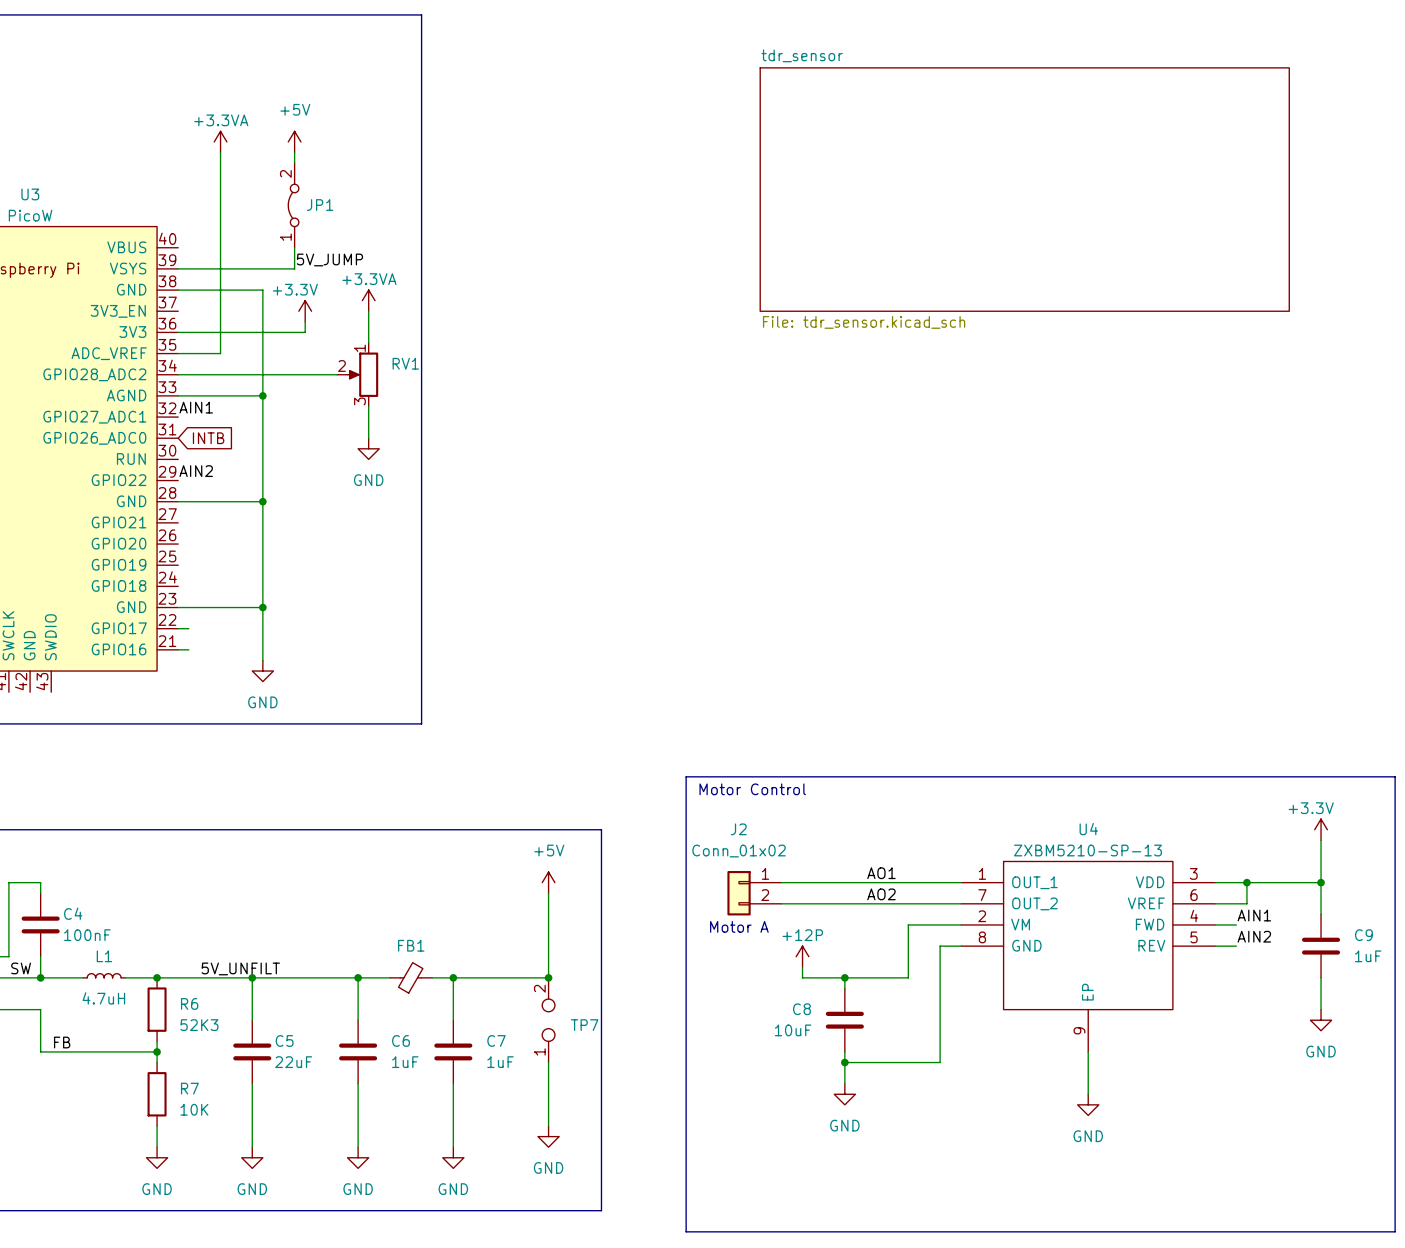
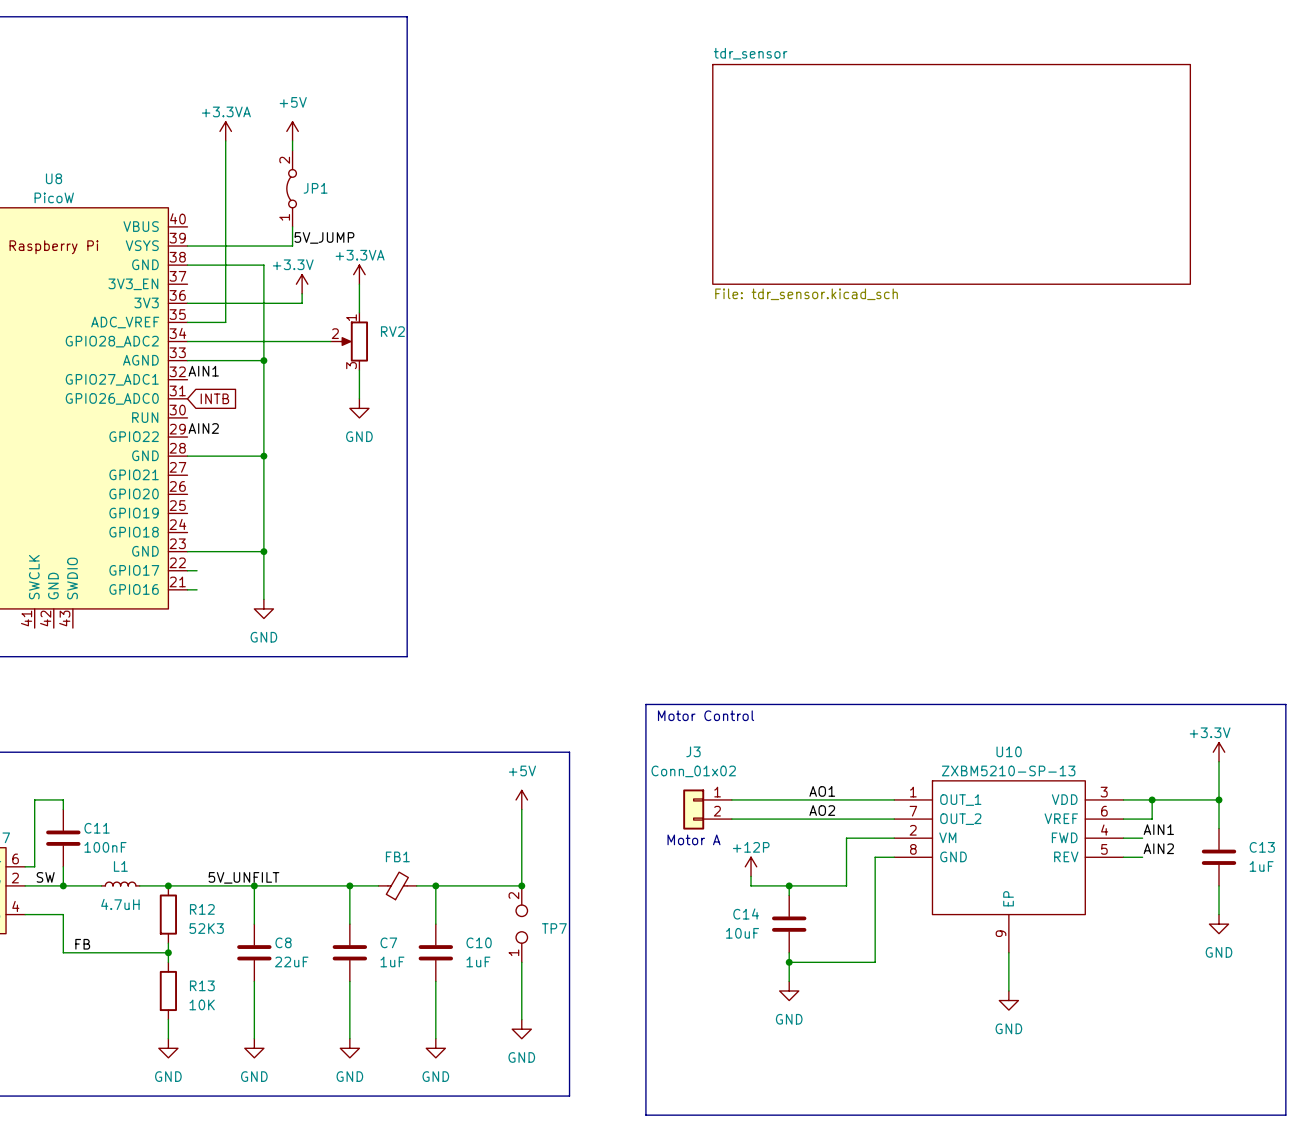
U3 name: U3 (30, 194) -> U8 (54, 178)
RV1 name: RV1 (405, 363) -> RV2 (392, 331)
J2 name: J2 (738, 829) -> J3 (693, 751)
U4 name: U4 (1088, 829) -> U10 (1009, 751)
C4 name: C4 (73, 913) -> C11 (97, 828)
C9 name: C9 (1363, 935) -> C13 (1262, 847)
R6 name: R6 (189, 1003) -> R12 (202, 909)
C8 name: C8 (801, 1009) -> C14 (746, 913)
C5 name: C5 (284, 1040) -> C8 (283, 942)
C6 name: C6 (401, 1040) -> C7 (388, 942)
C7 name: C7 (496, 1040) -> C10 (479, 942)
R7 name: R7 (189, 1088) -> R13 (202, 985)

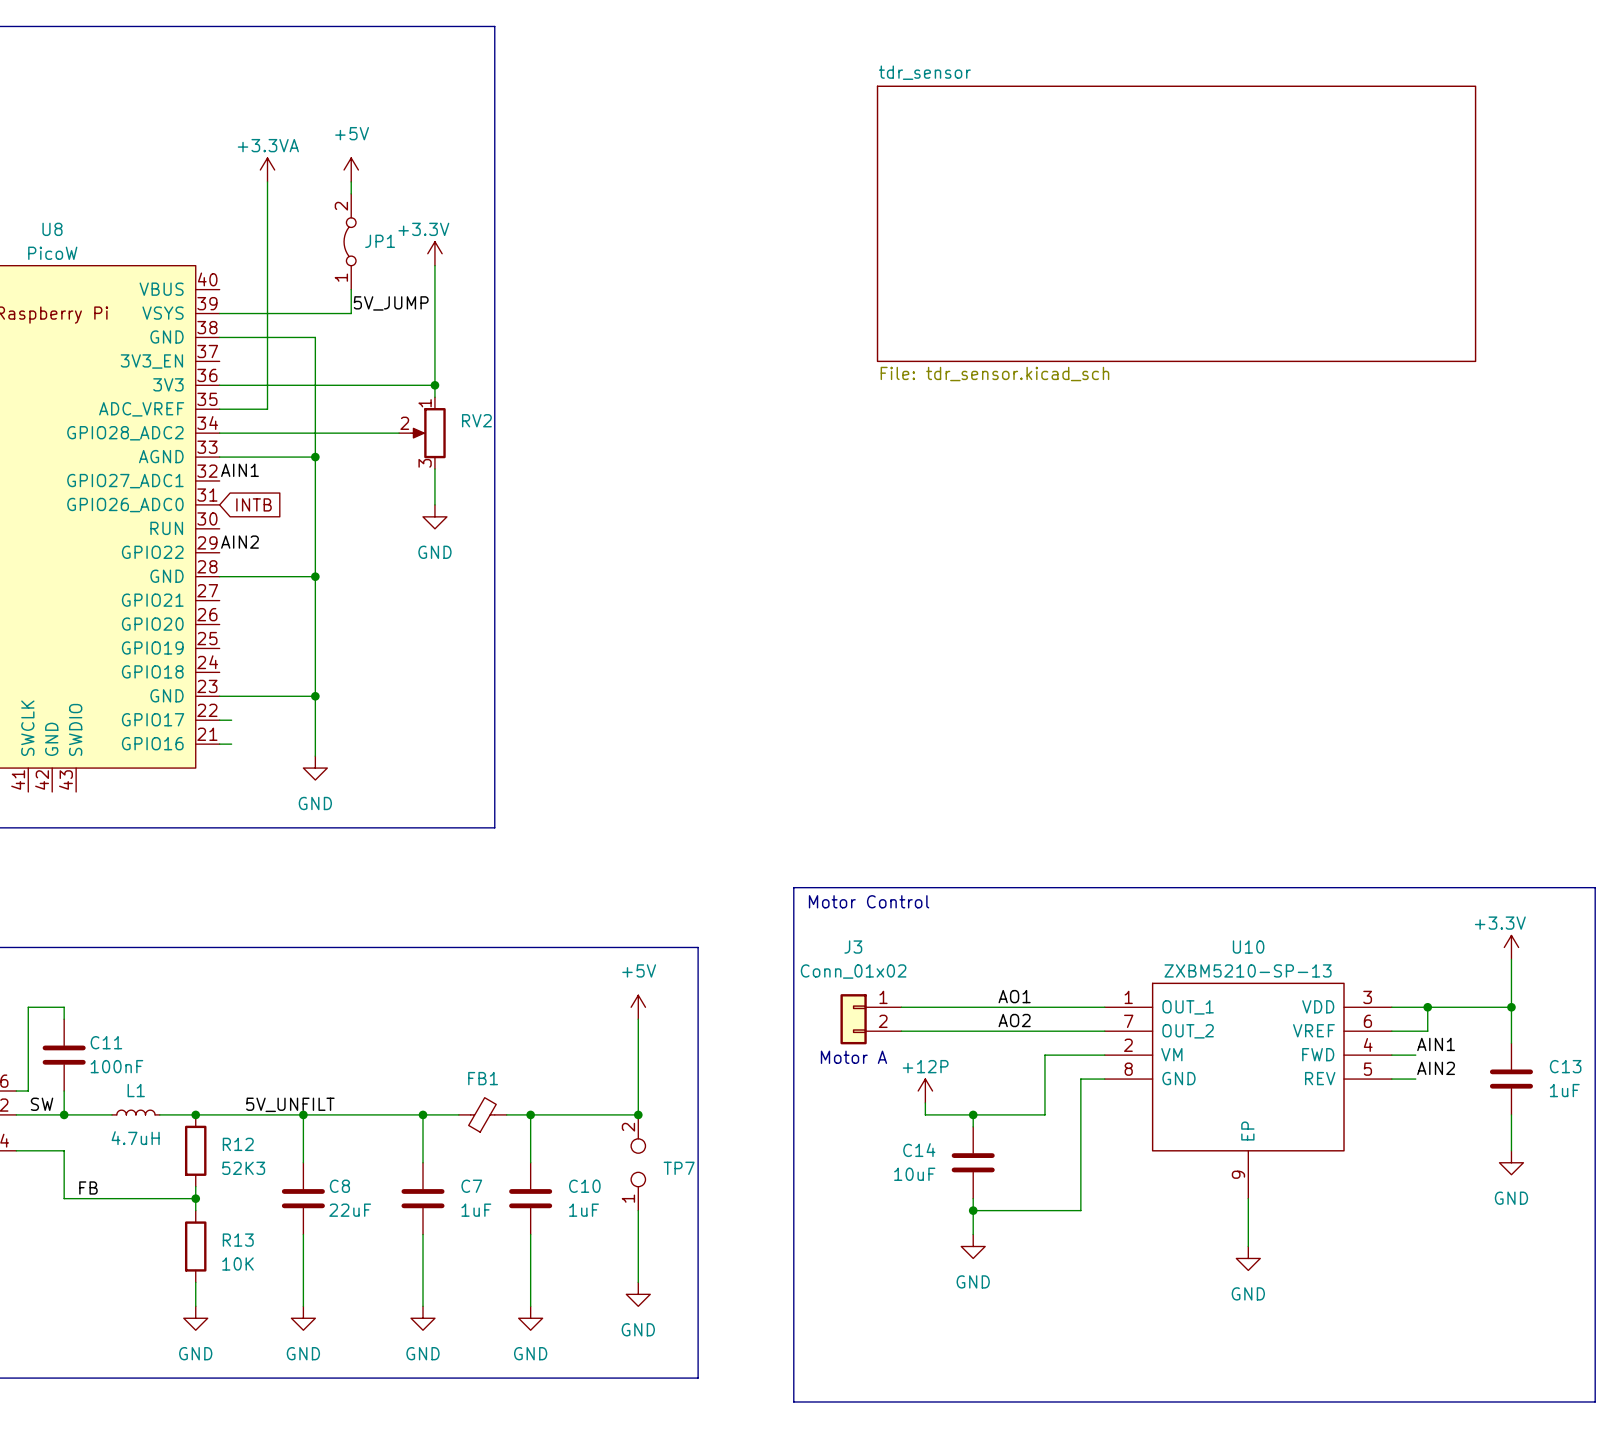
wire: none -> (434, 265) (434, 361)
power symbol: +3.3VA (359, 274) -> none
power symbol position: +3.3V (302, 284) -> +3.3V (434, 253)
wire: (302, 293) (302, 303) -> (434, 385) (363, 385)
junction: none -> (434, 385)

